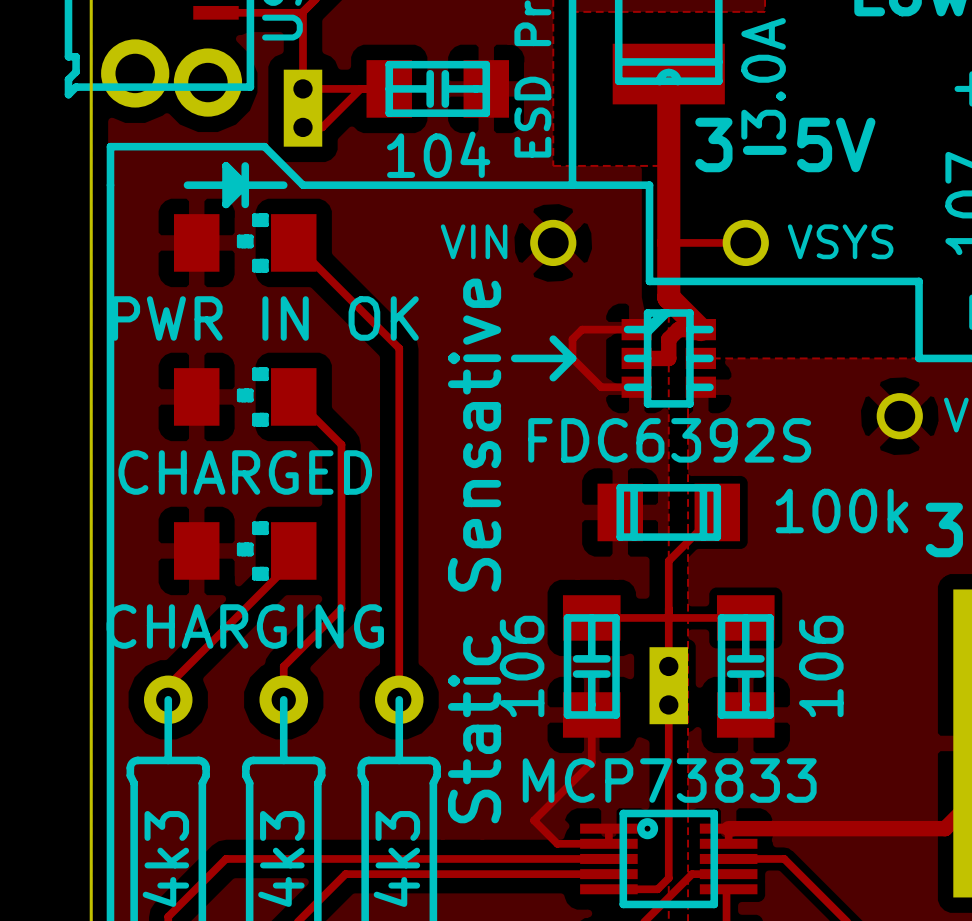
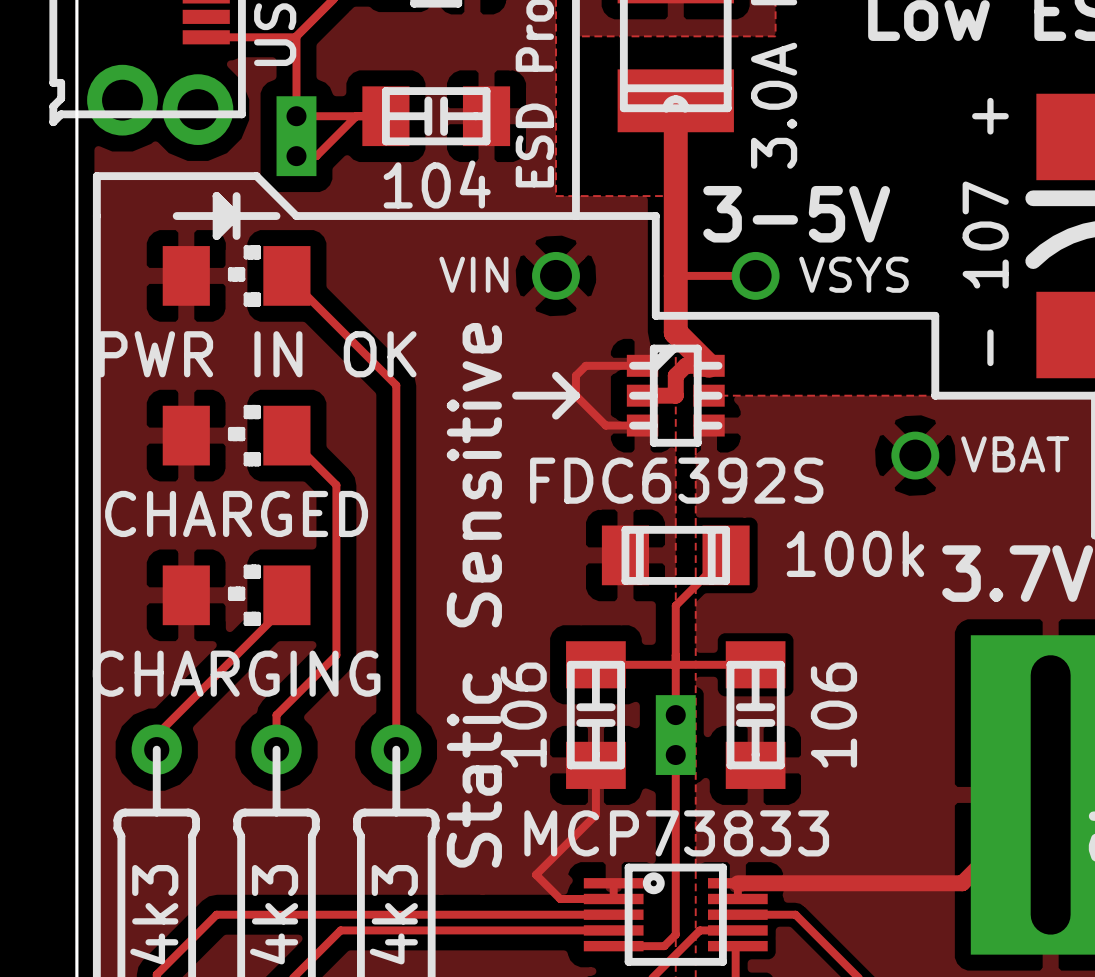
text position: 3-5V (785, 144) -> 3-5V (796, 214)
text: Static Sensative (474, 550) -> Static Sensitive (474, 595)

